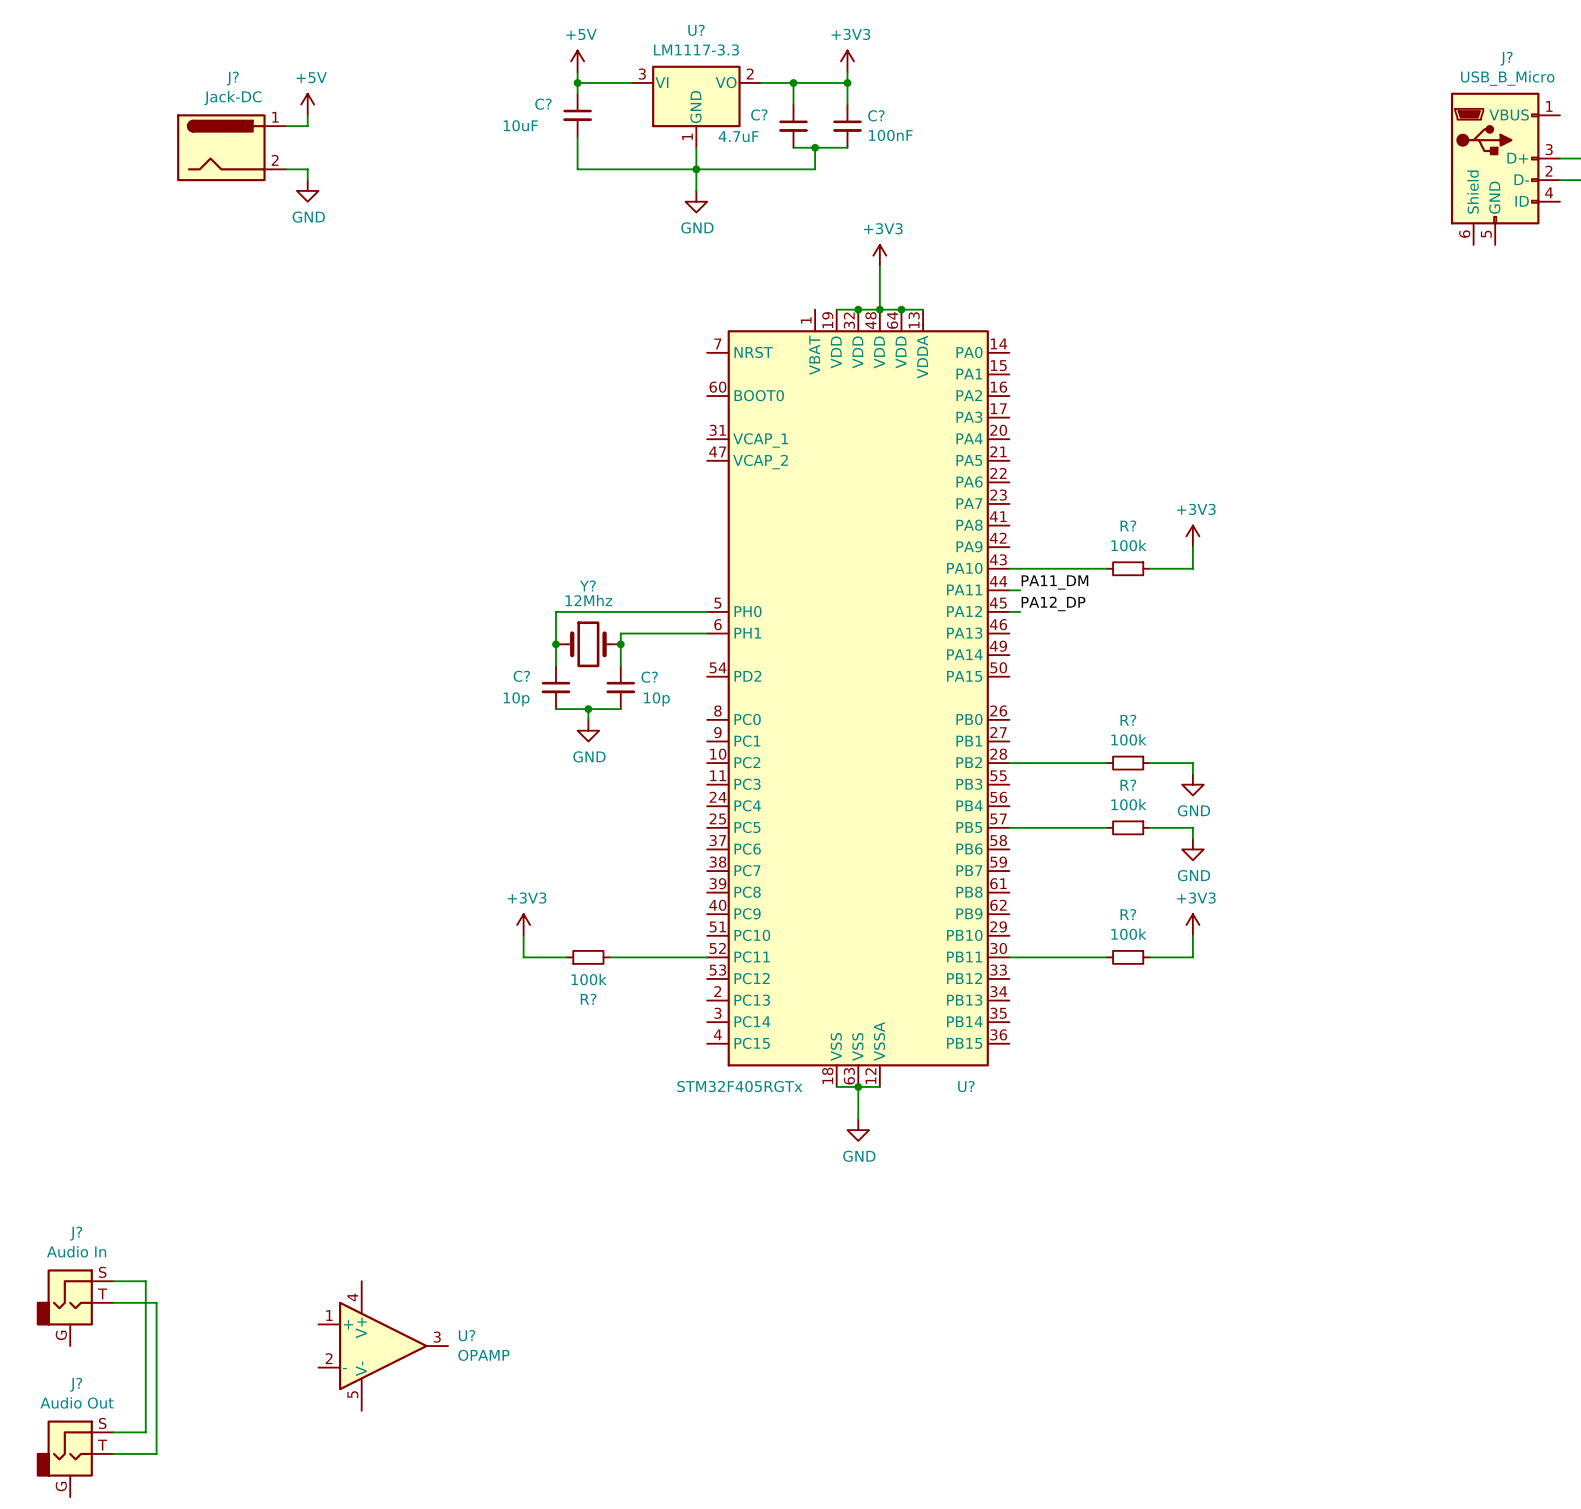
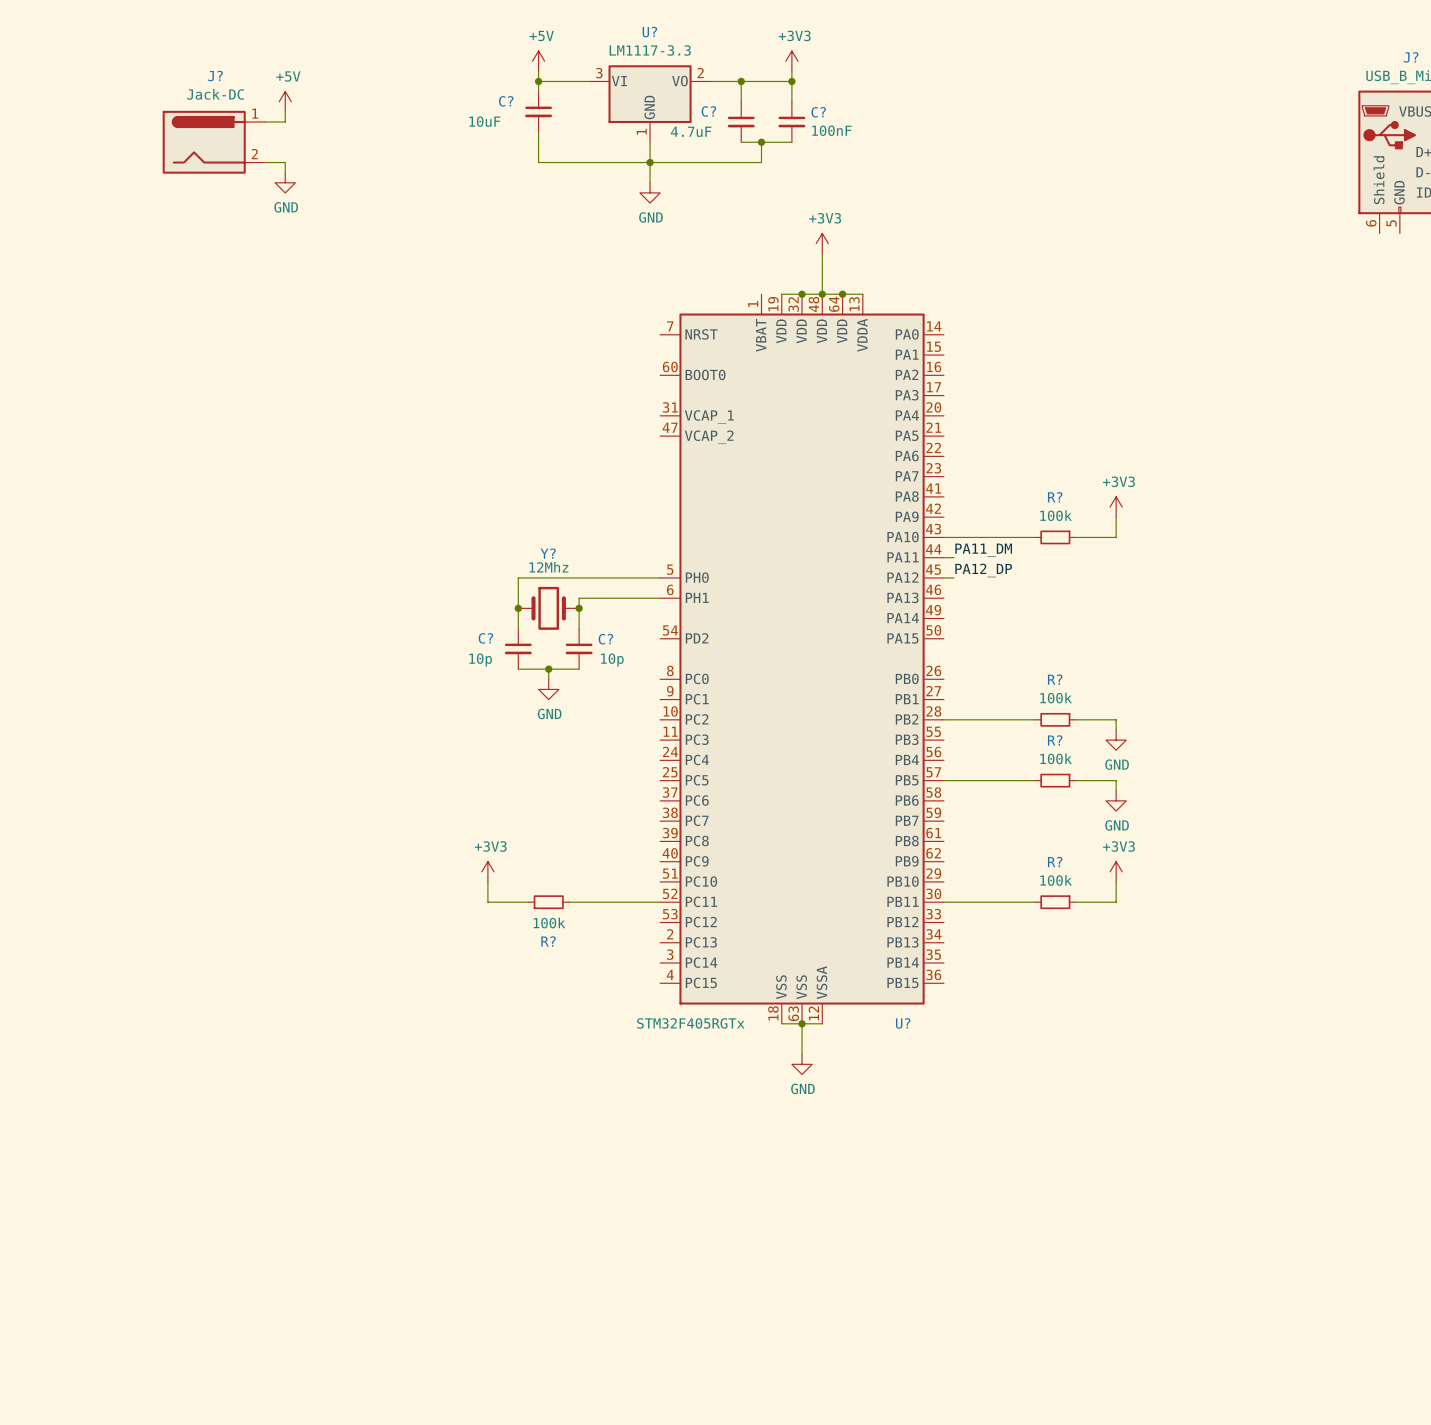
wire: (113, 1281) (145, 1281) (145, 1432) (113, 1432) -> none
wire: (113, 1302) (156, 1302) (156, 1453) (113, 1453) -> none
J?: Audio In (75, 1307) -> none
U?: OPAMP (383, 1346) -> none
J?: Audio Out (75, 1458) -> none

